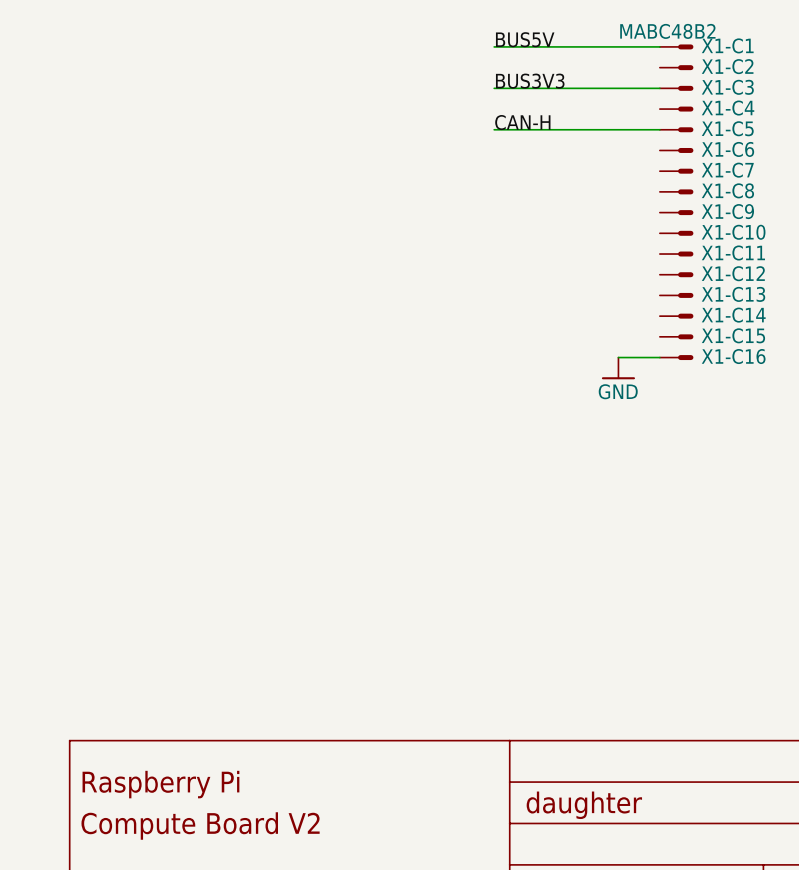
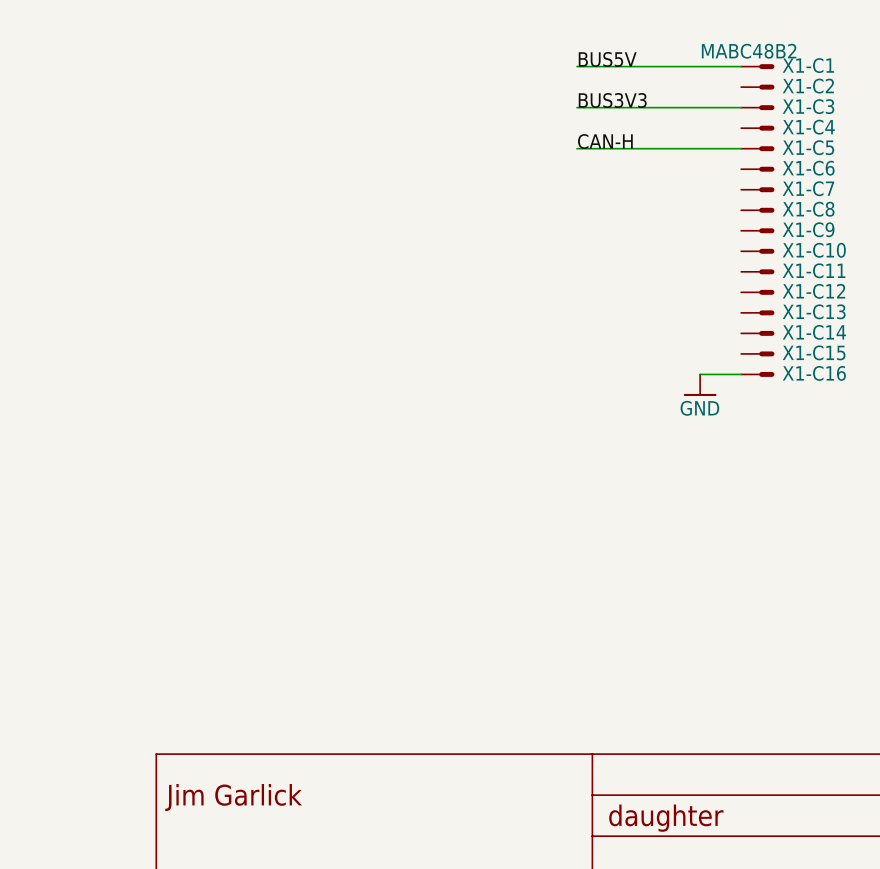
text: Raspberry Pi (160, 784) -> Jim Garlick (233, 797)
text: Compute Board V2 (200, 825) -> none

